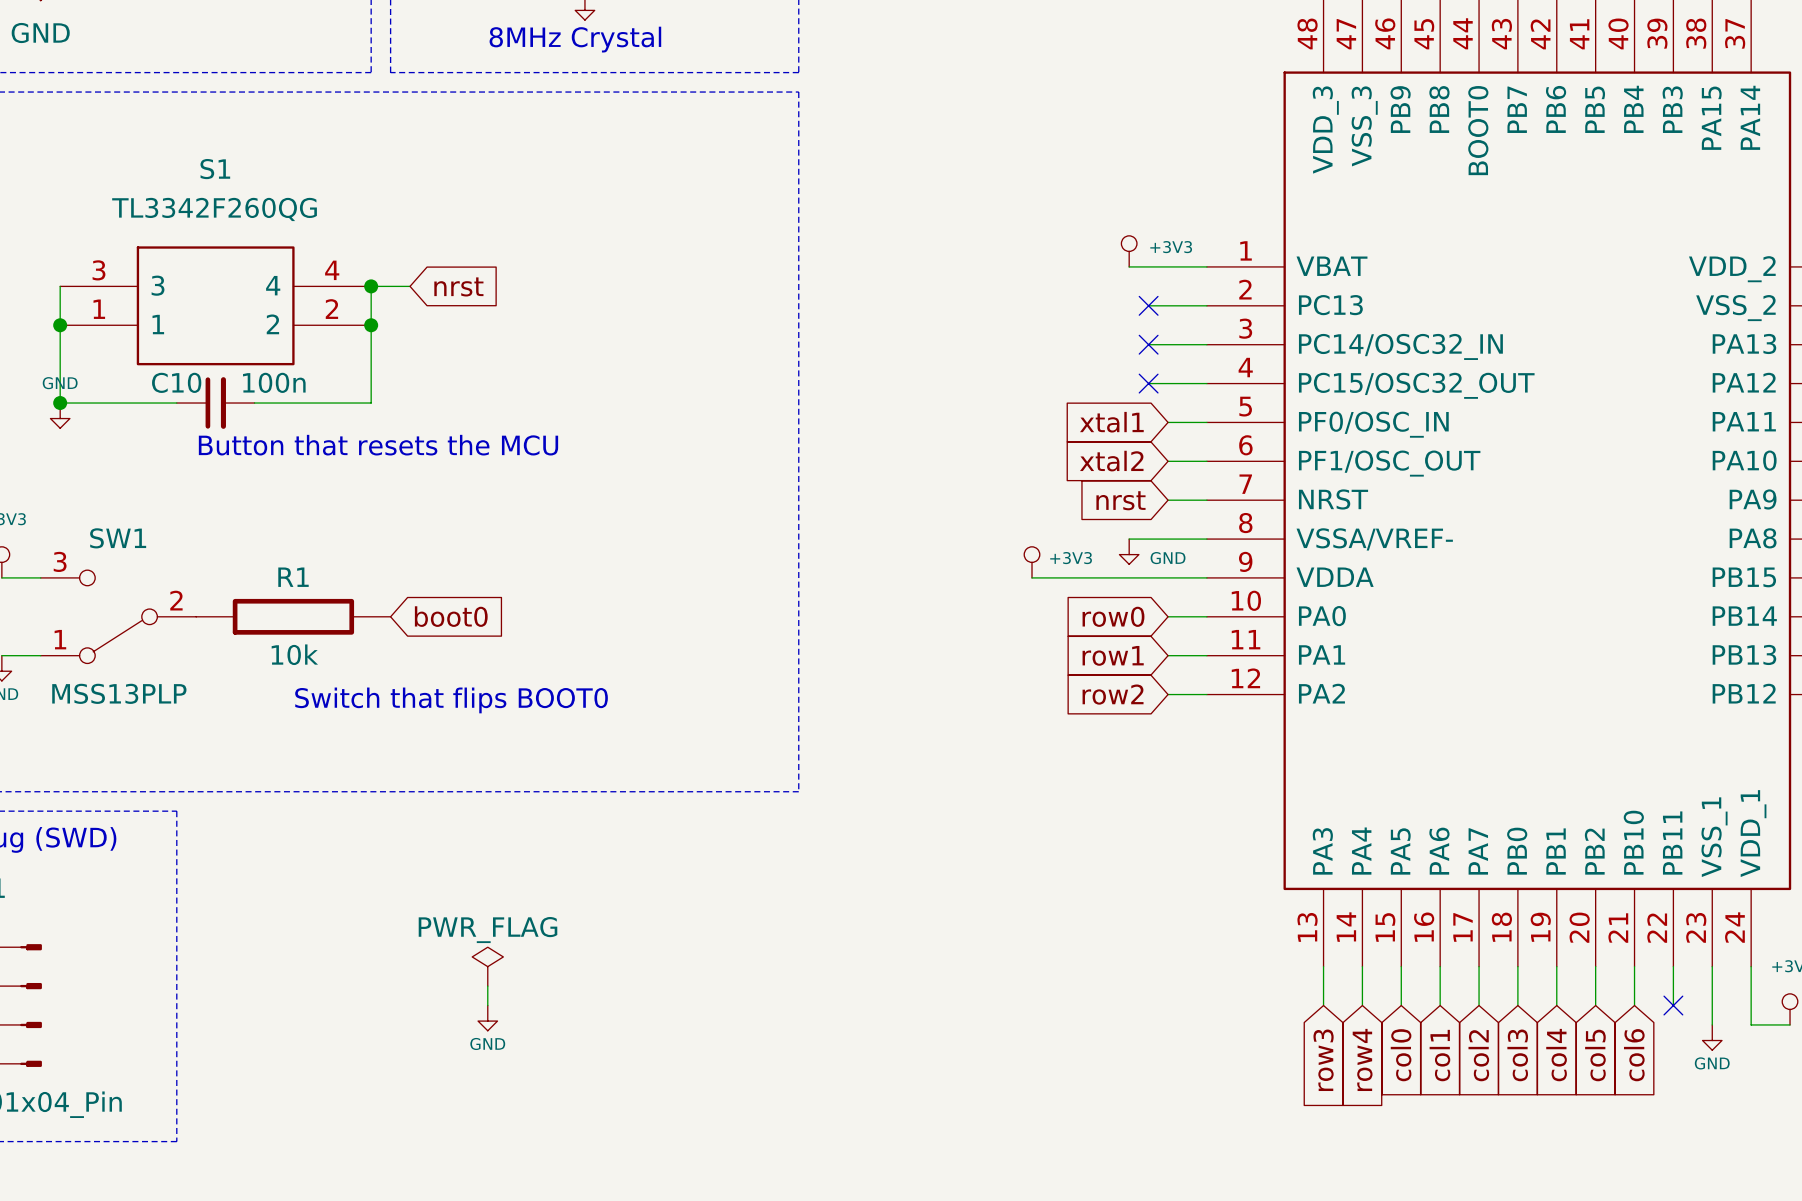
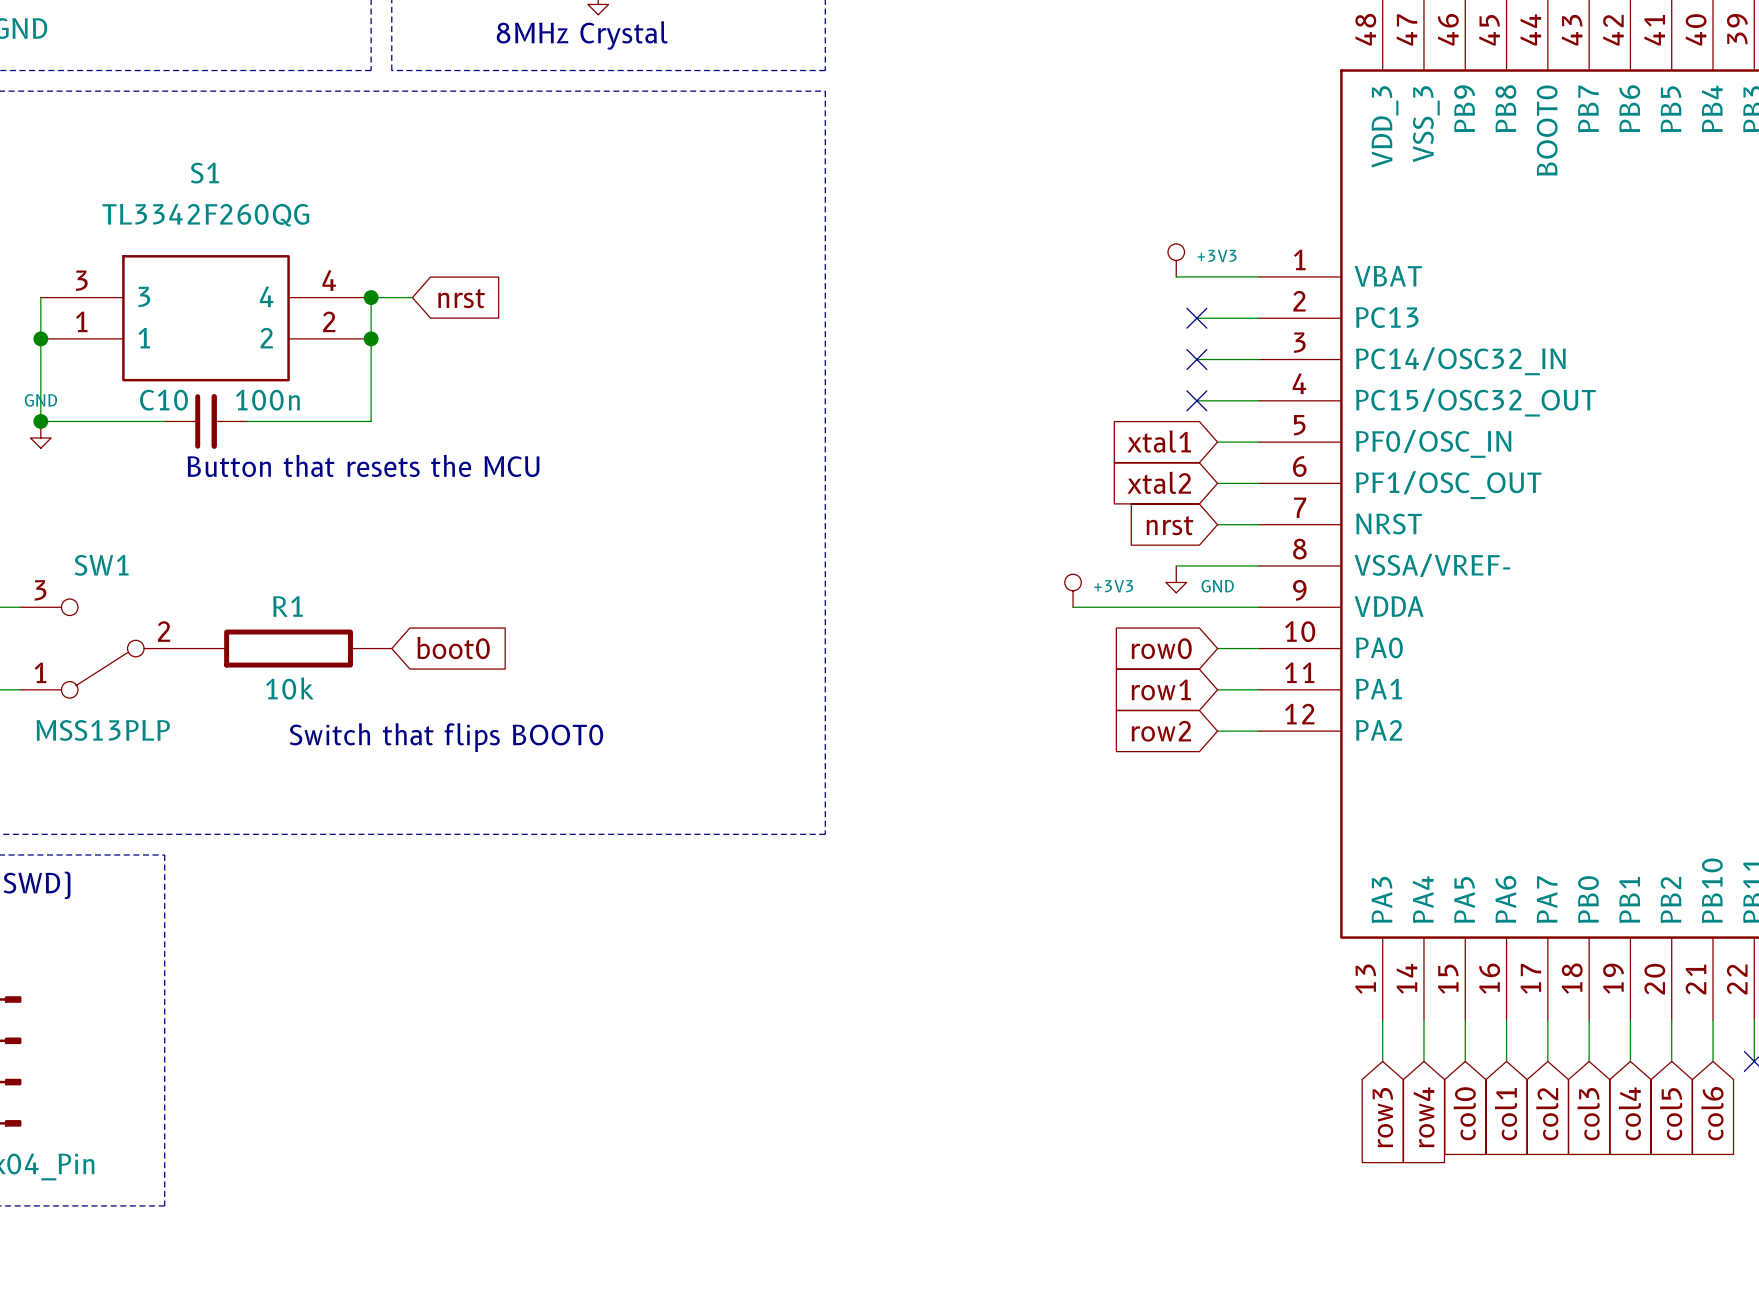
power symbol: PWR_FLAG (487, 966) -> none
wire: (487, 986) (487, 1005) -> none
power symbol: GND (487, 1018) -> none

